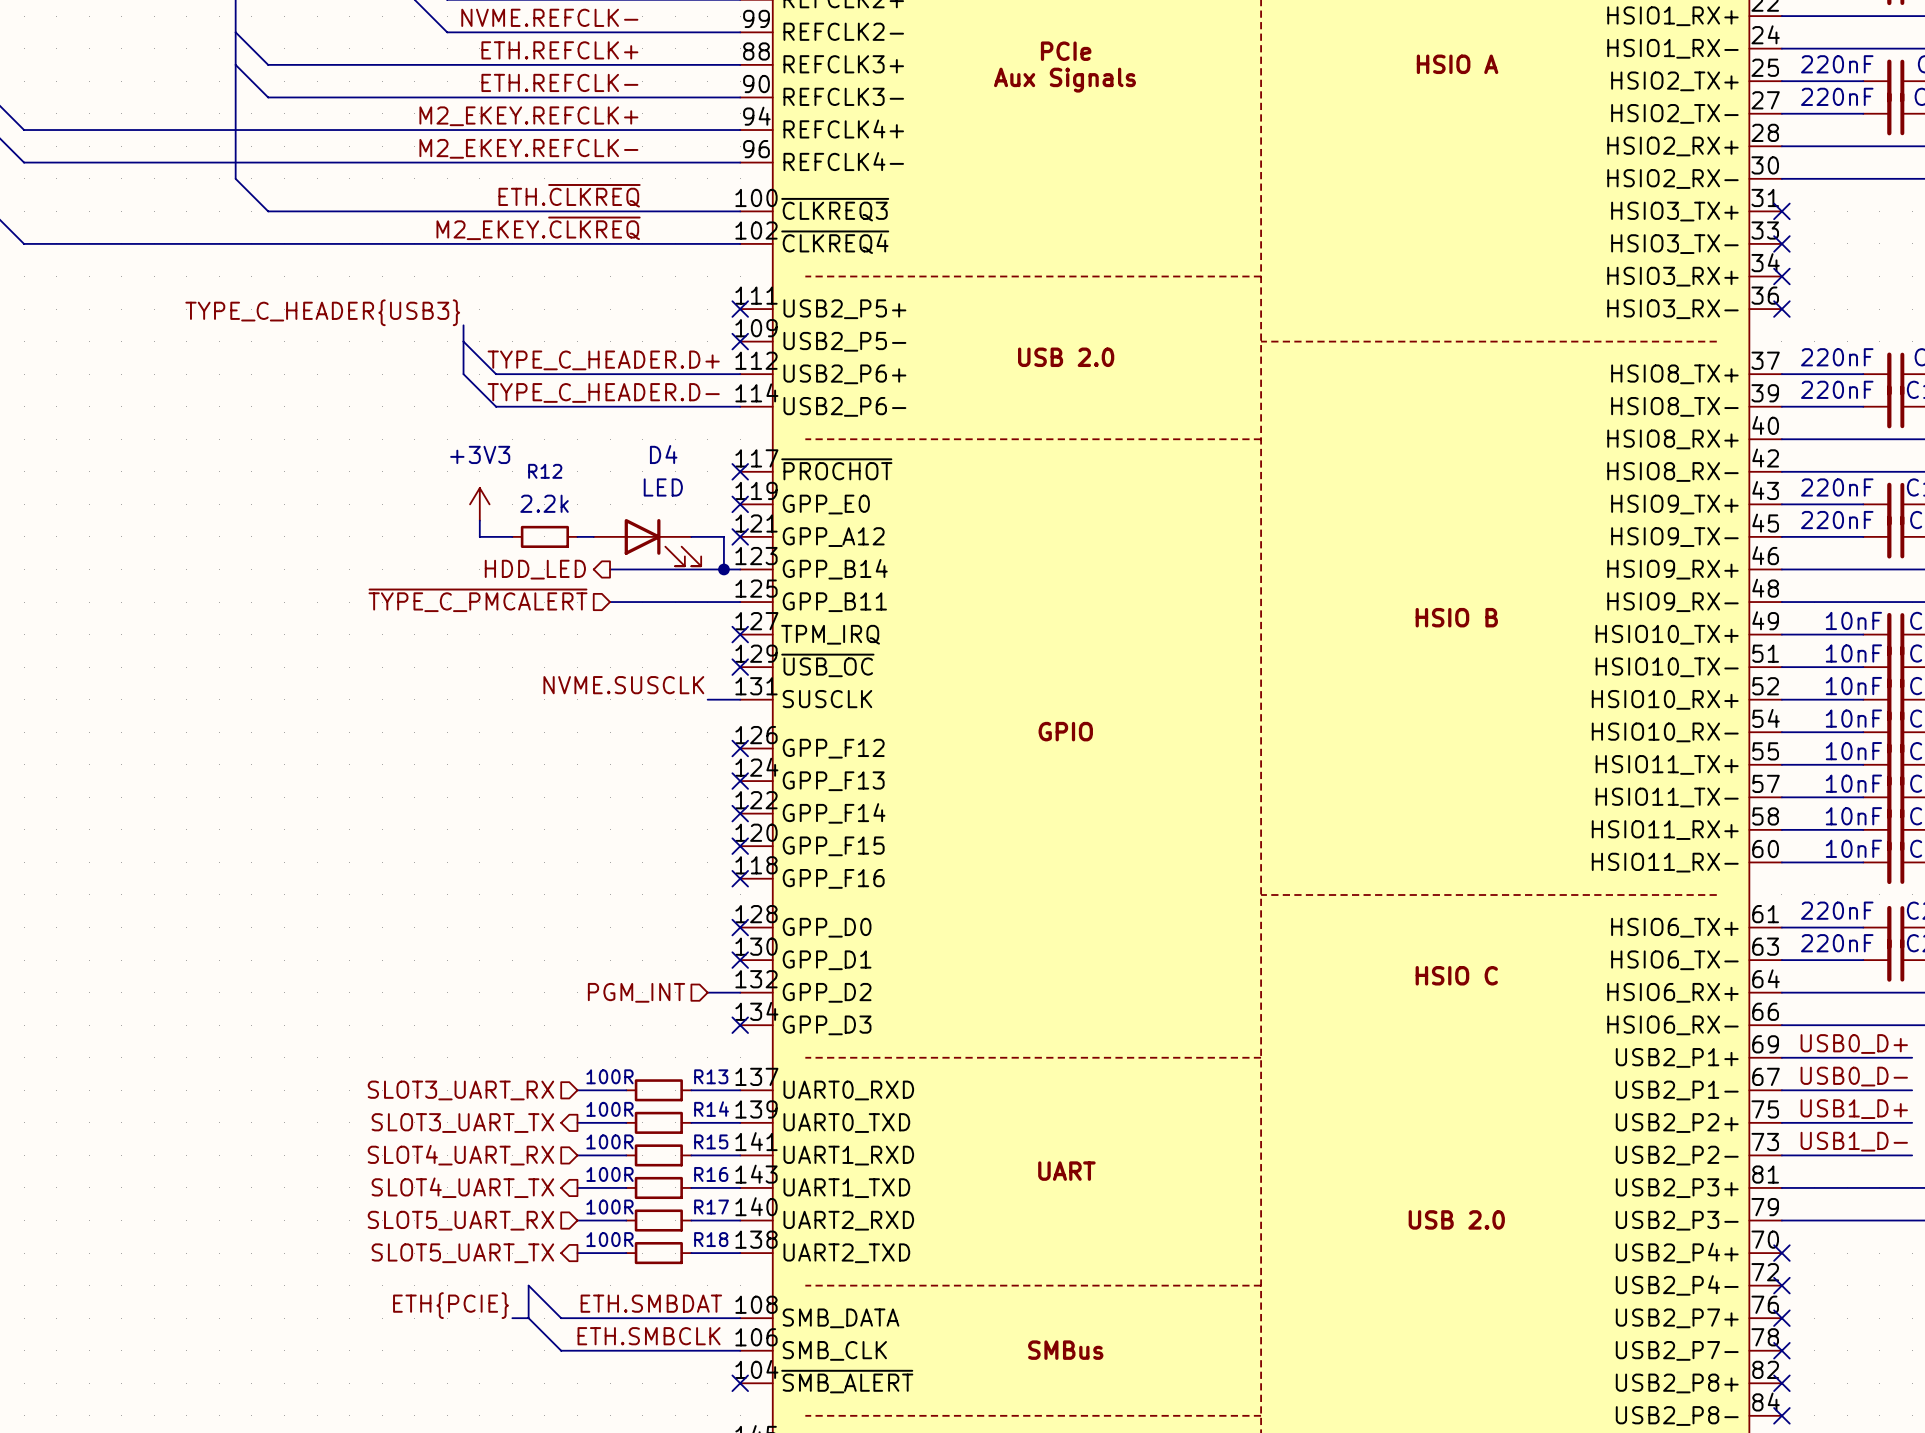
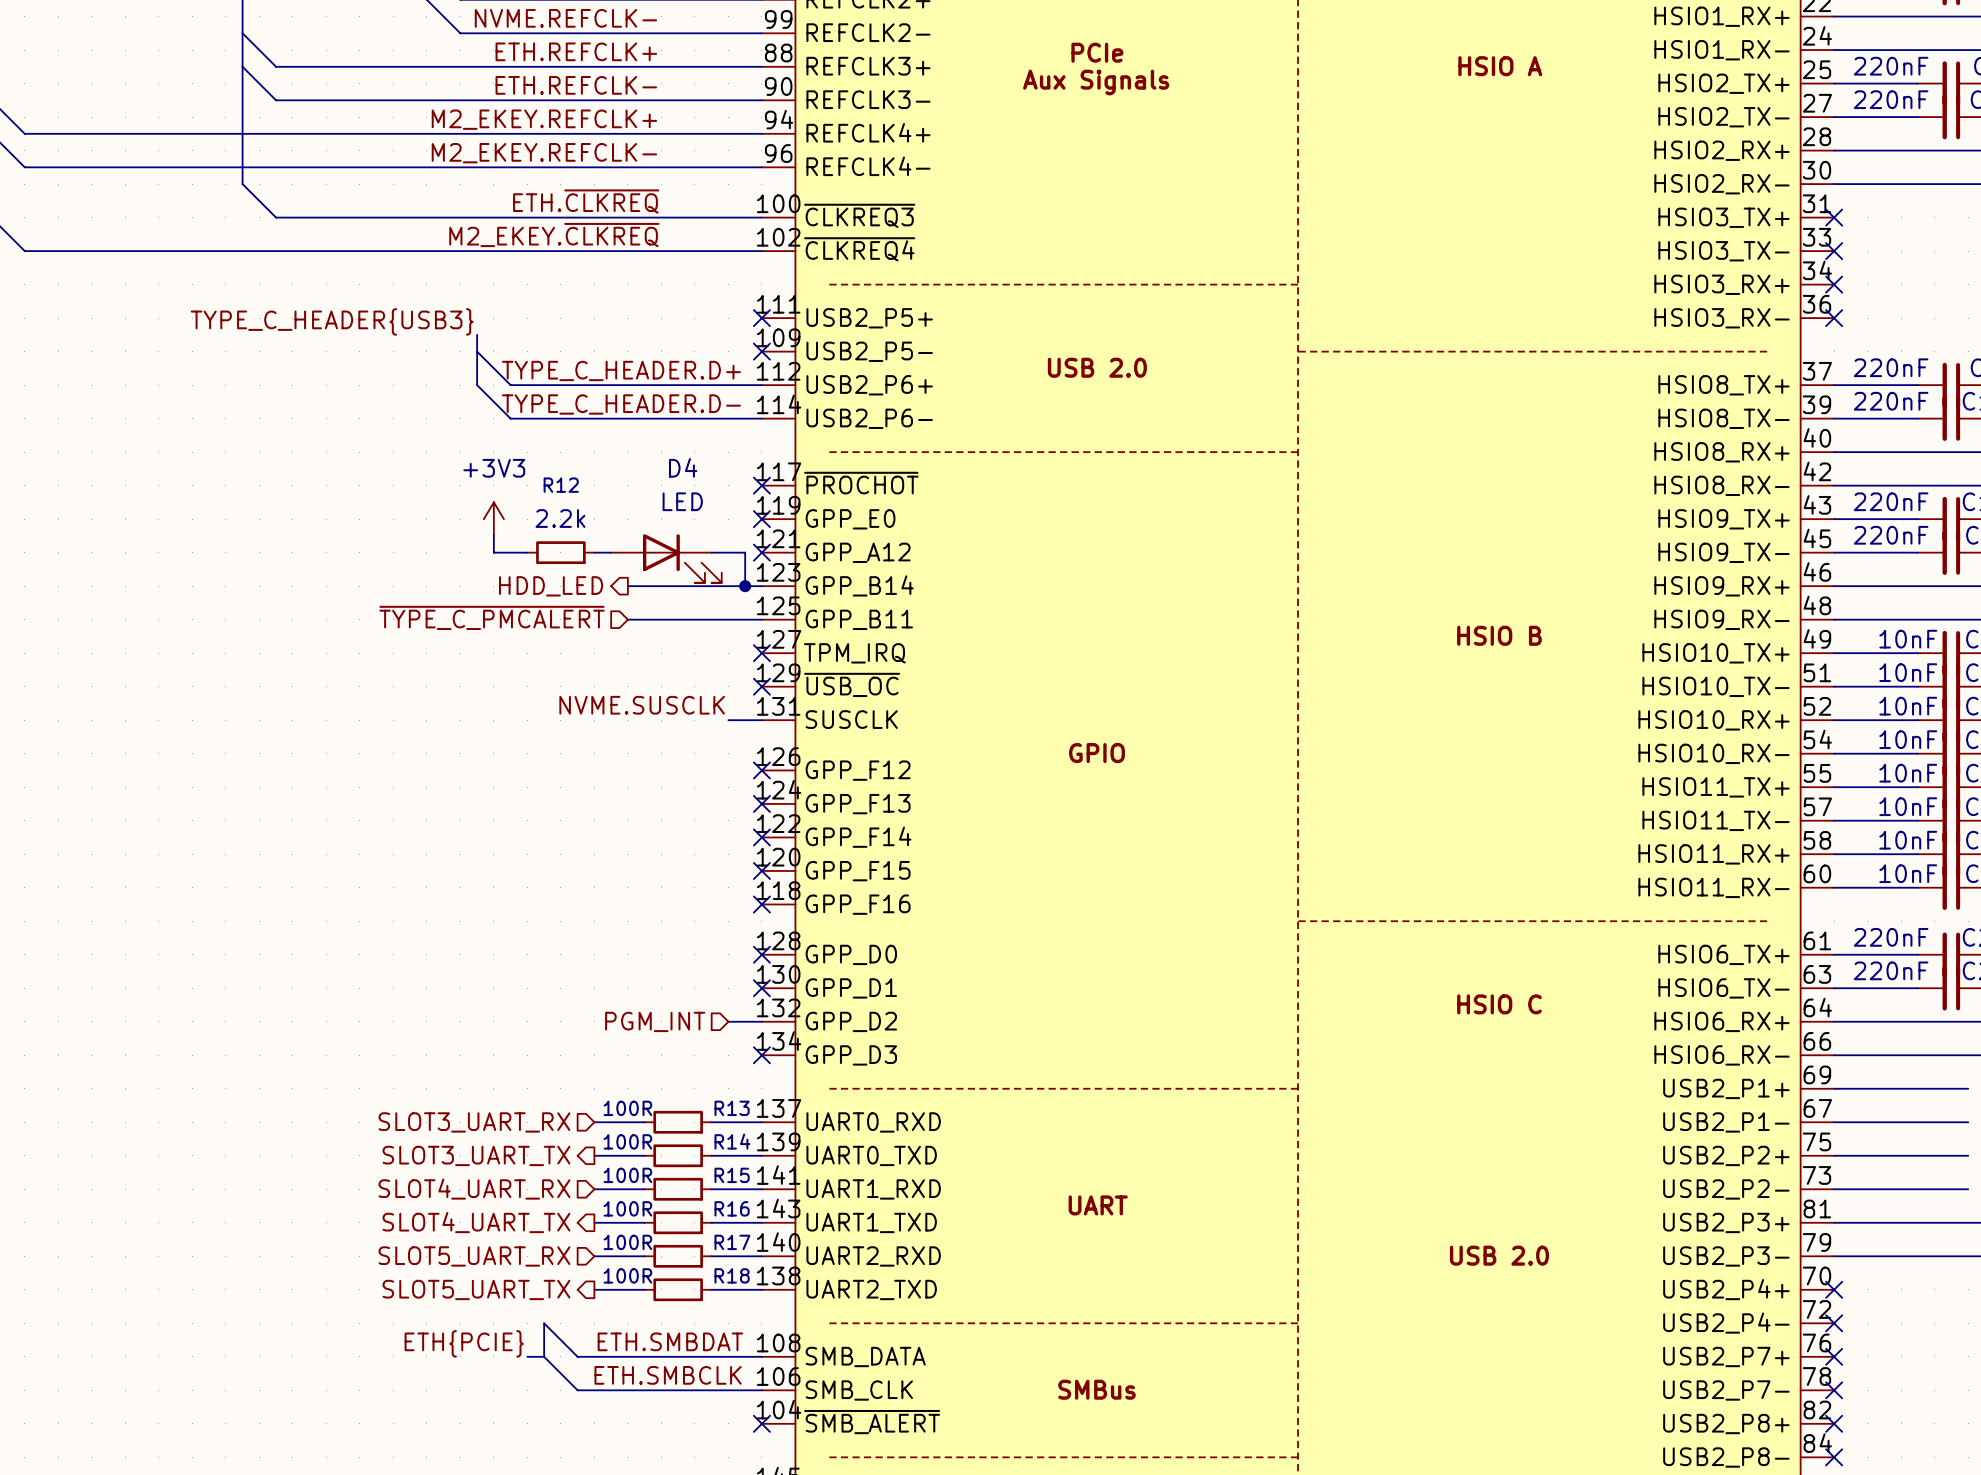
label: USB0_D+ (1854, 1044) -> none
label: USB0_D- (1854, 1076) -> none
label: USB1_D+ (1854, 1109) -> none
label: USB1_D- (1854, 1141) -> none

